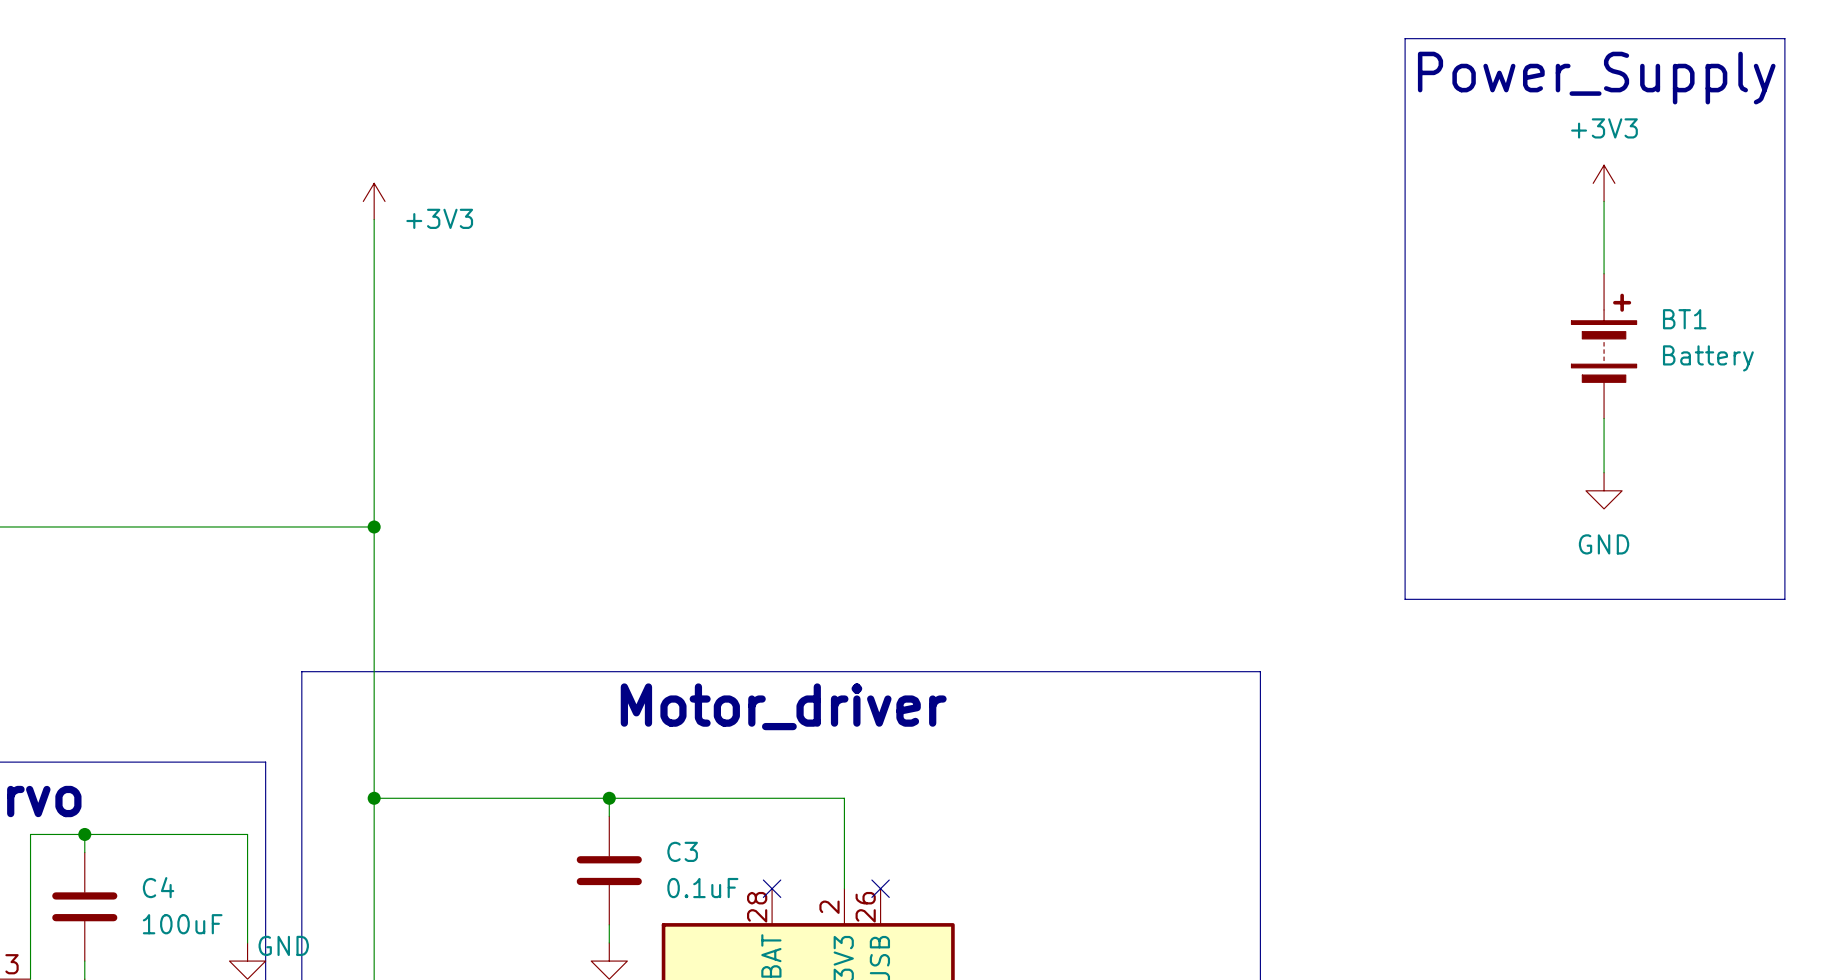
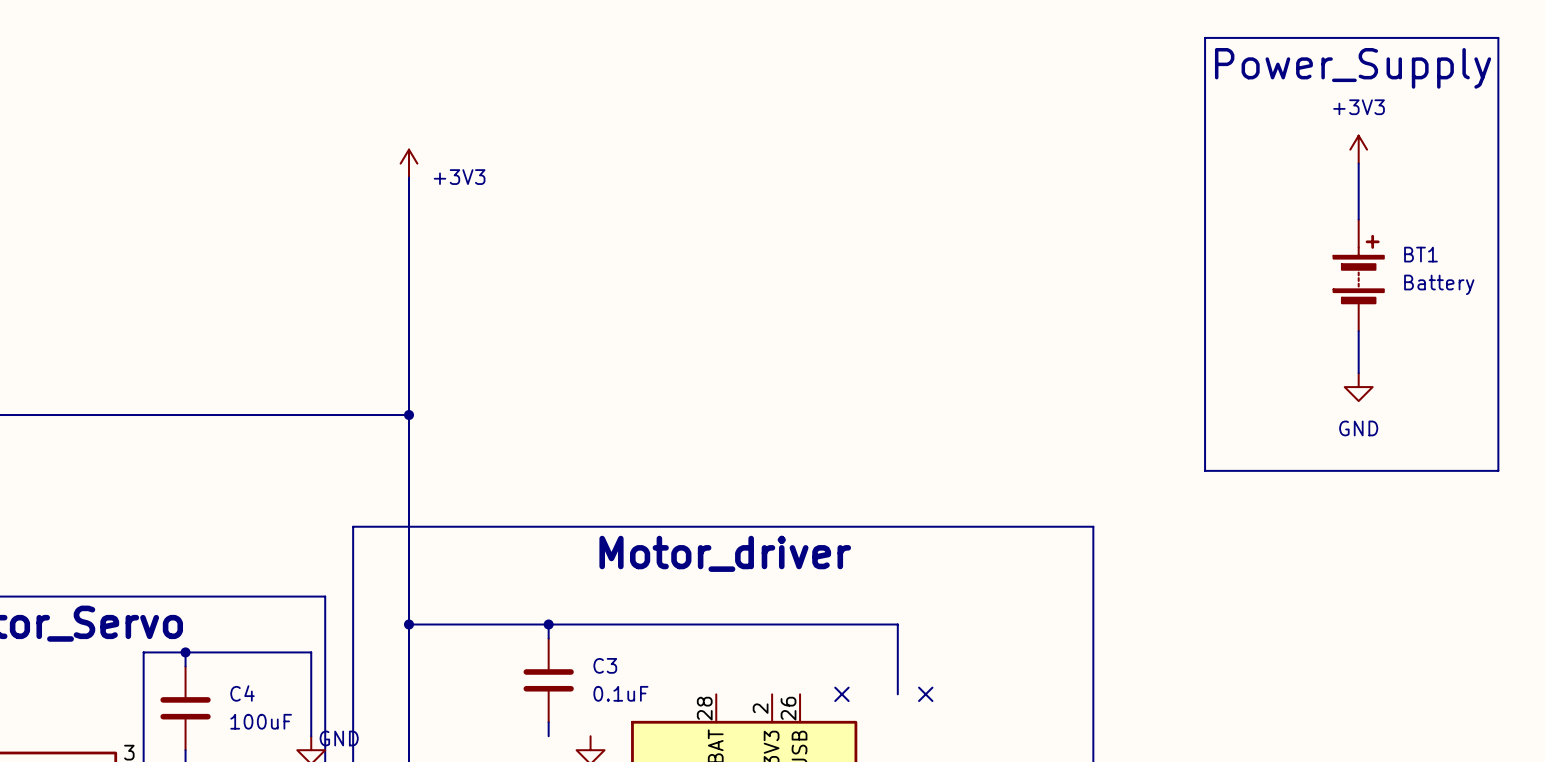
wire: (609, 798) (609, 816) -> (548, 624) (548, 638)
junction position: (609, 798) -> (548, 624)
wire: (844, 798) (844, 888) -> (772, 624) (897, 624) (897, 694)
C3 position: (609, 870) -> (548, 680)
no-connect mark: (772, 888) -> none
no-connect mark position: (880, 888) -> (841, 694)
no-connect mark: none -> (925, 694)
wire: (609, 924) (609, 942) -> (548, 722) (548, 736)

